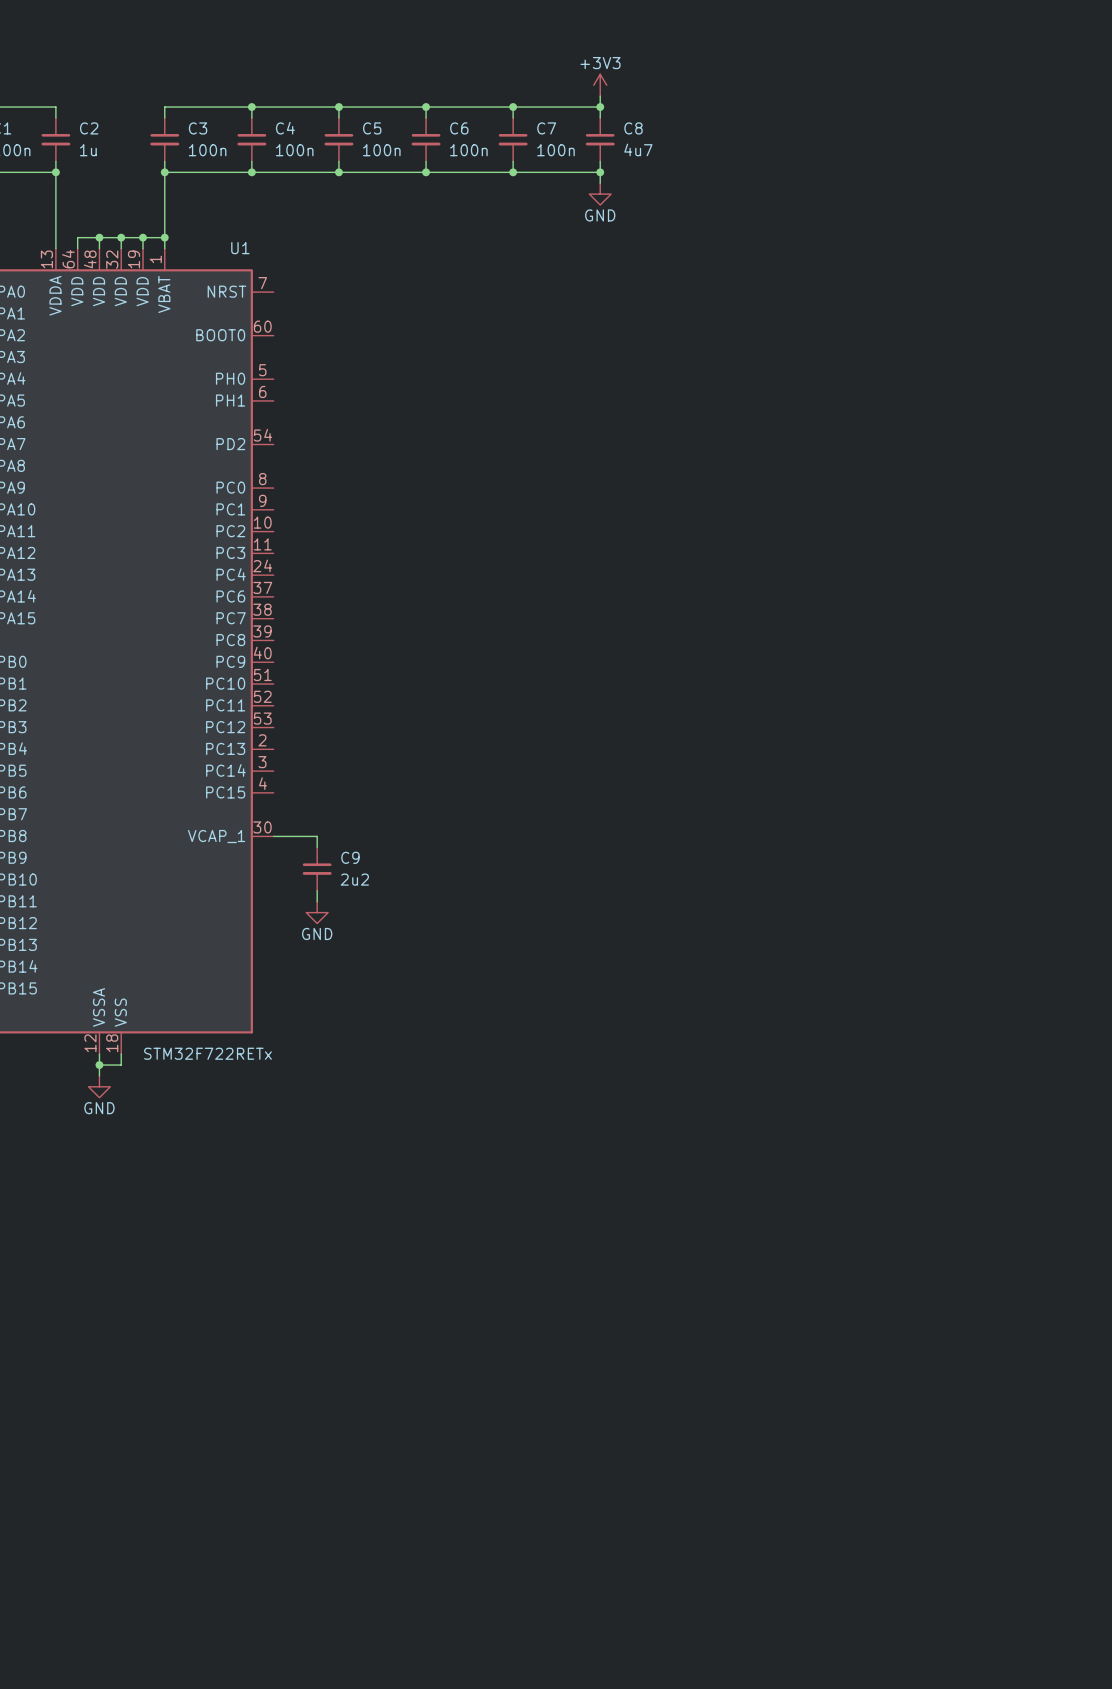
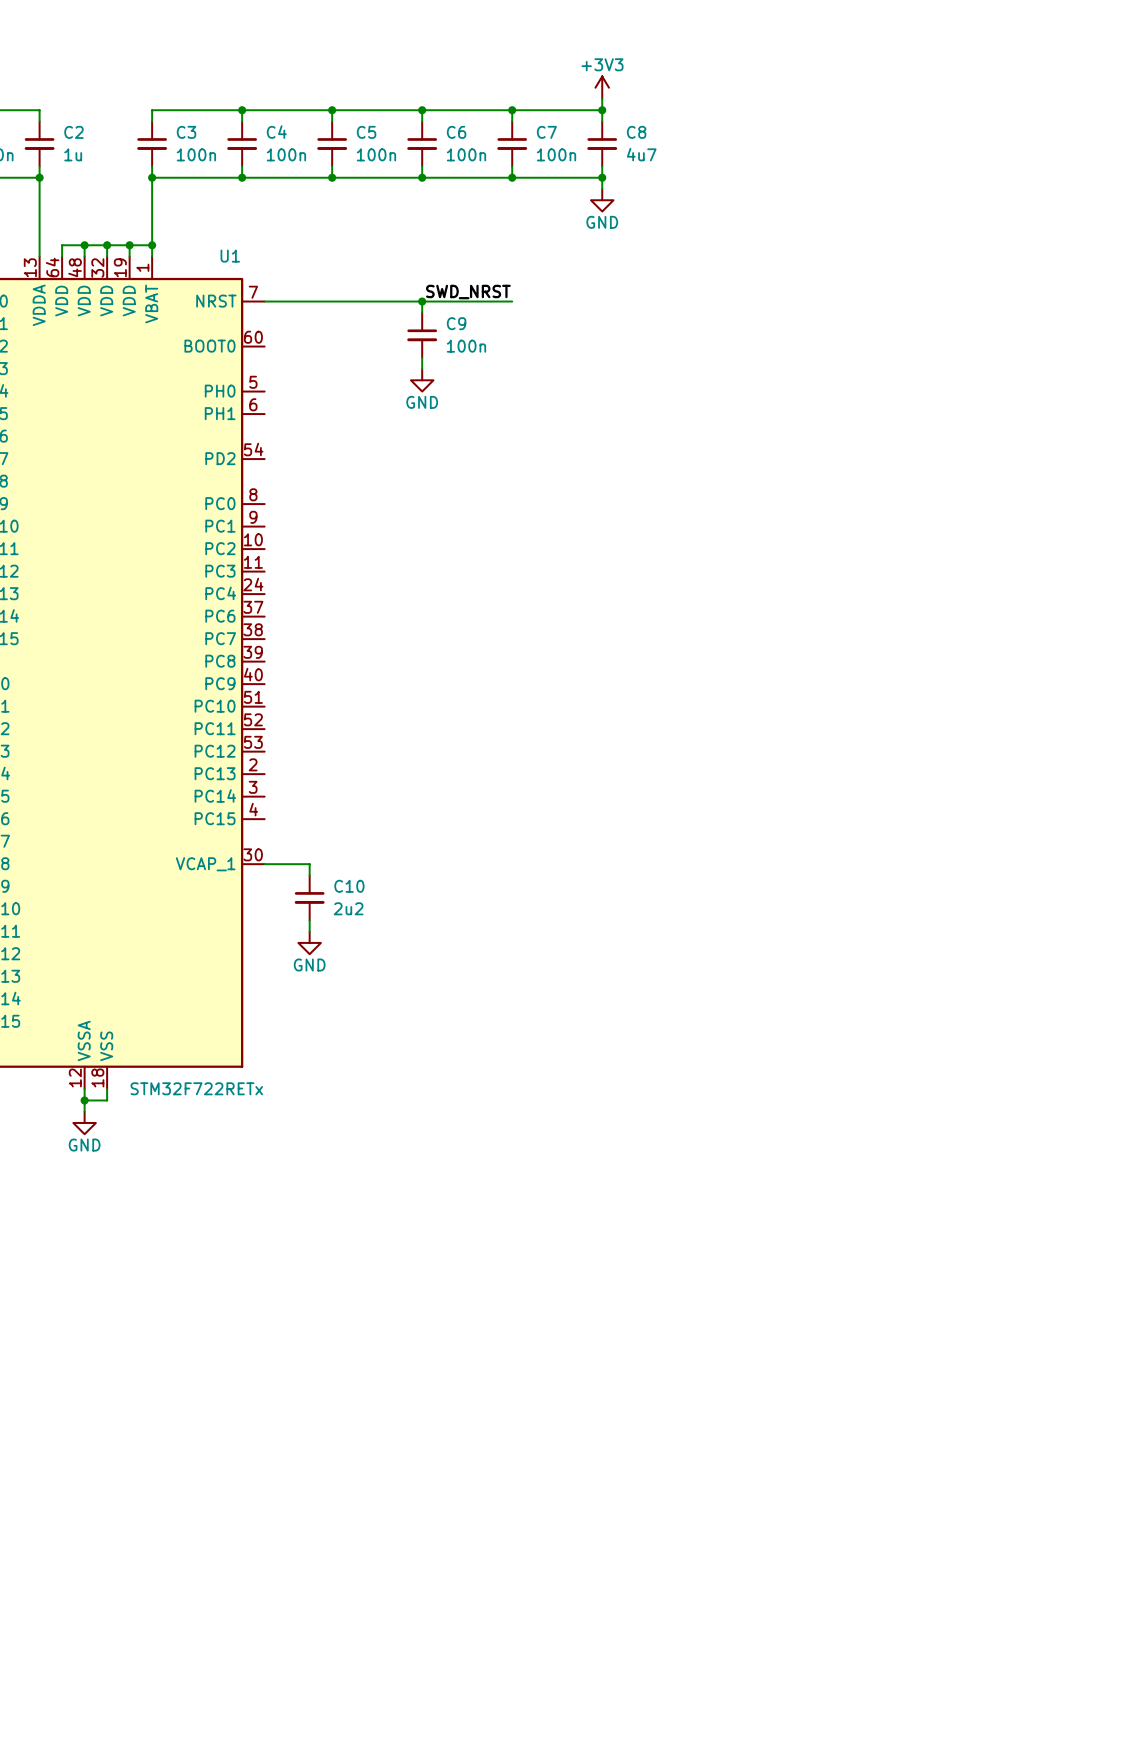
label: none -> SWD_NRST (468, 292)
wire: none -> (264, 301) (512, 301)
wire: none -> (422, 301) (422, 312)
junction: none -> (422, 301)
C9: none -> 100n (422, 335)
wire: none -> (422, 357) (422, 369)
power symbol: none -> GND (422, 380)
C9 name: C9 (350, 857) -> C10 (349, 886)

